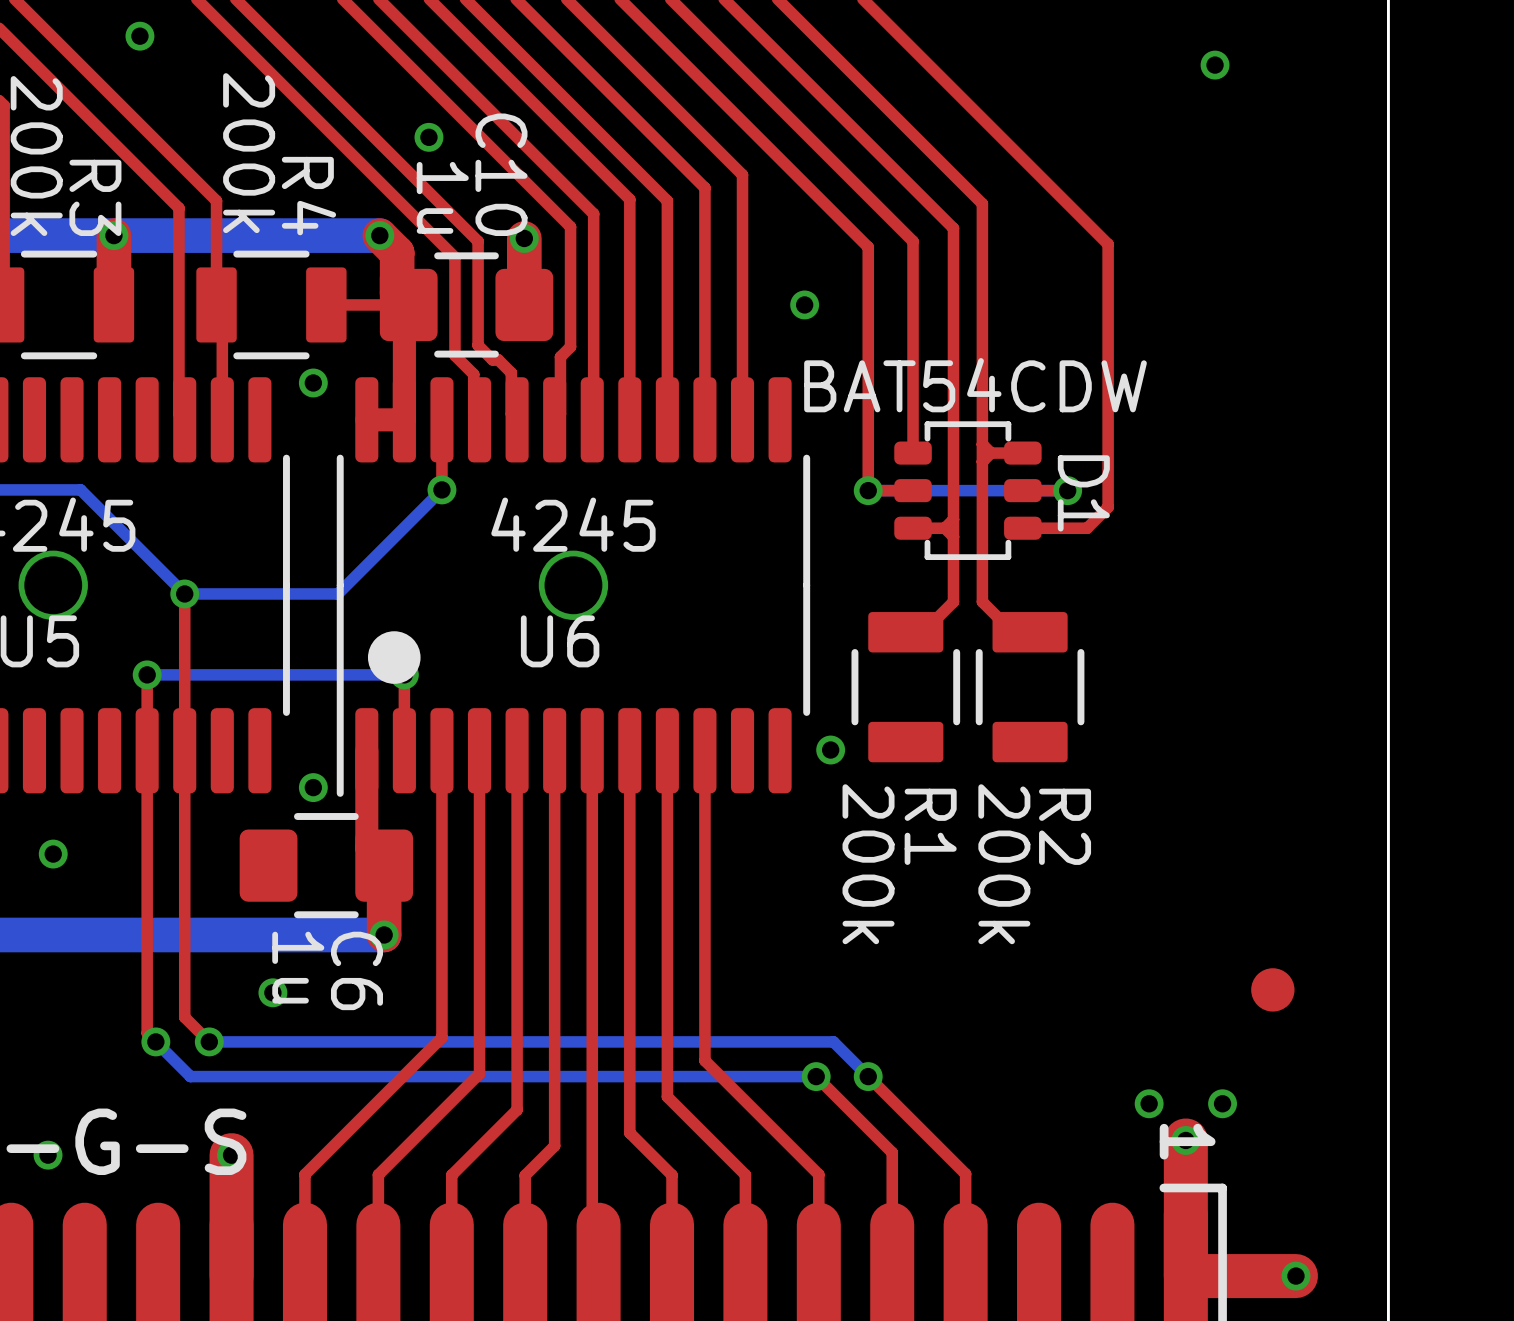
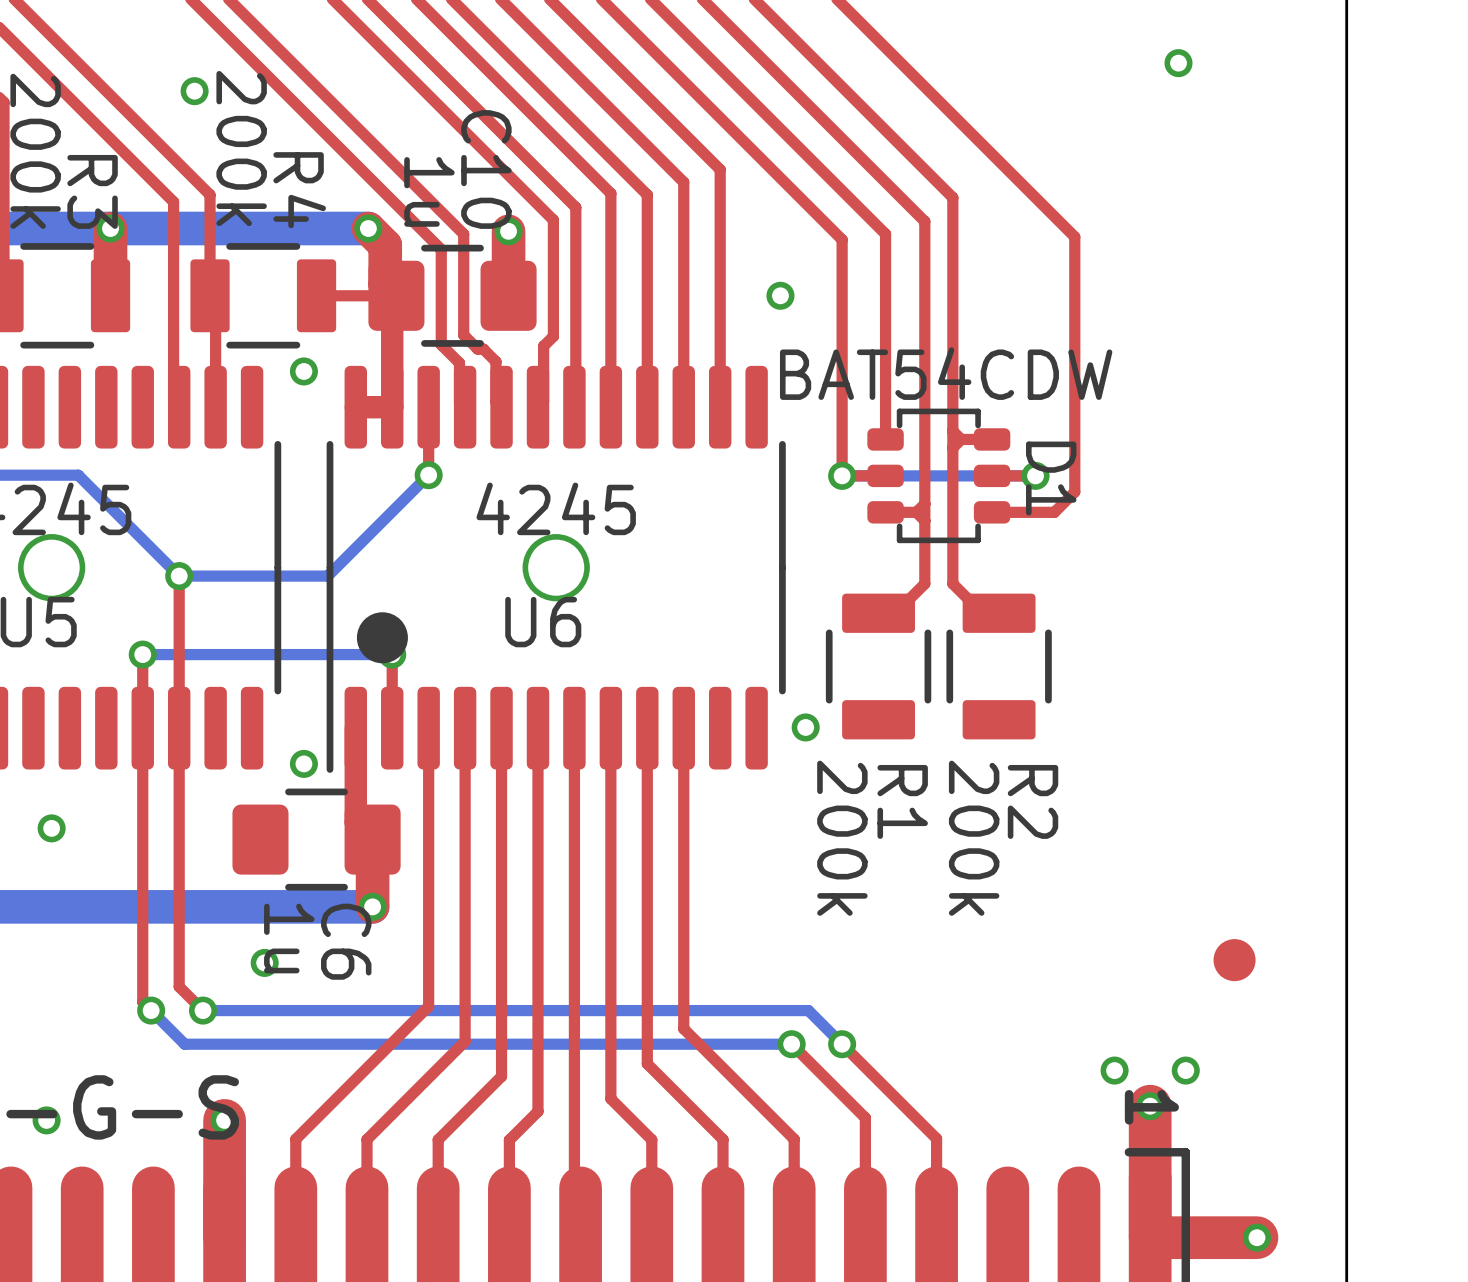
via position: (139, 36) -> (194, 91)
via: (428, 137) -> none

